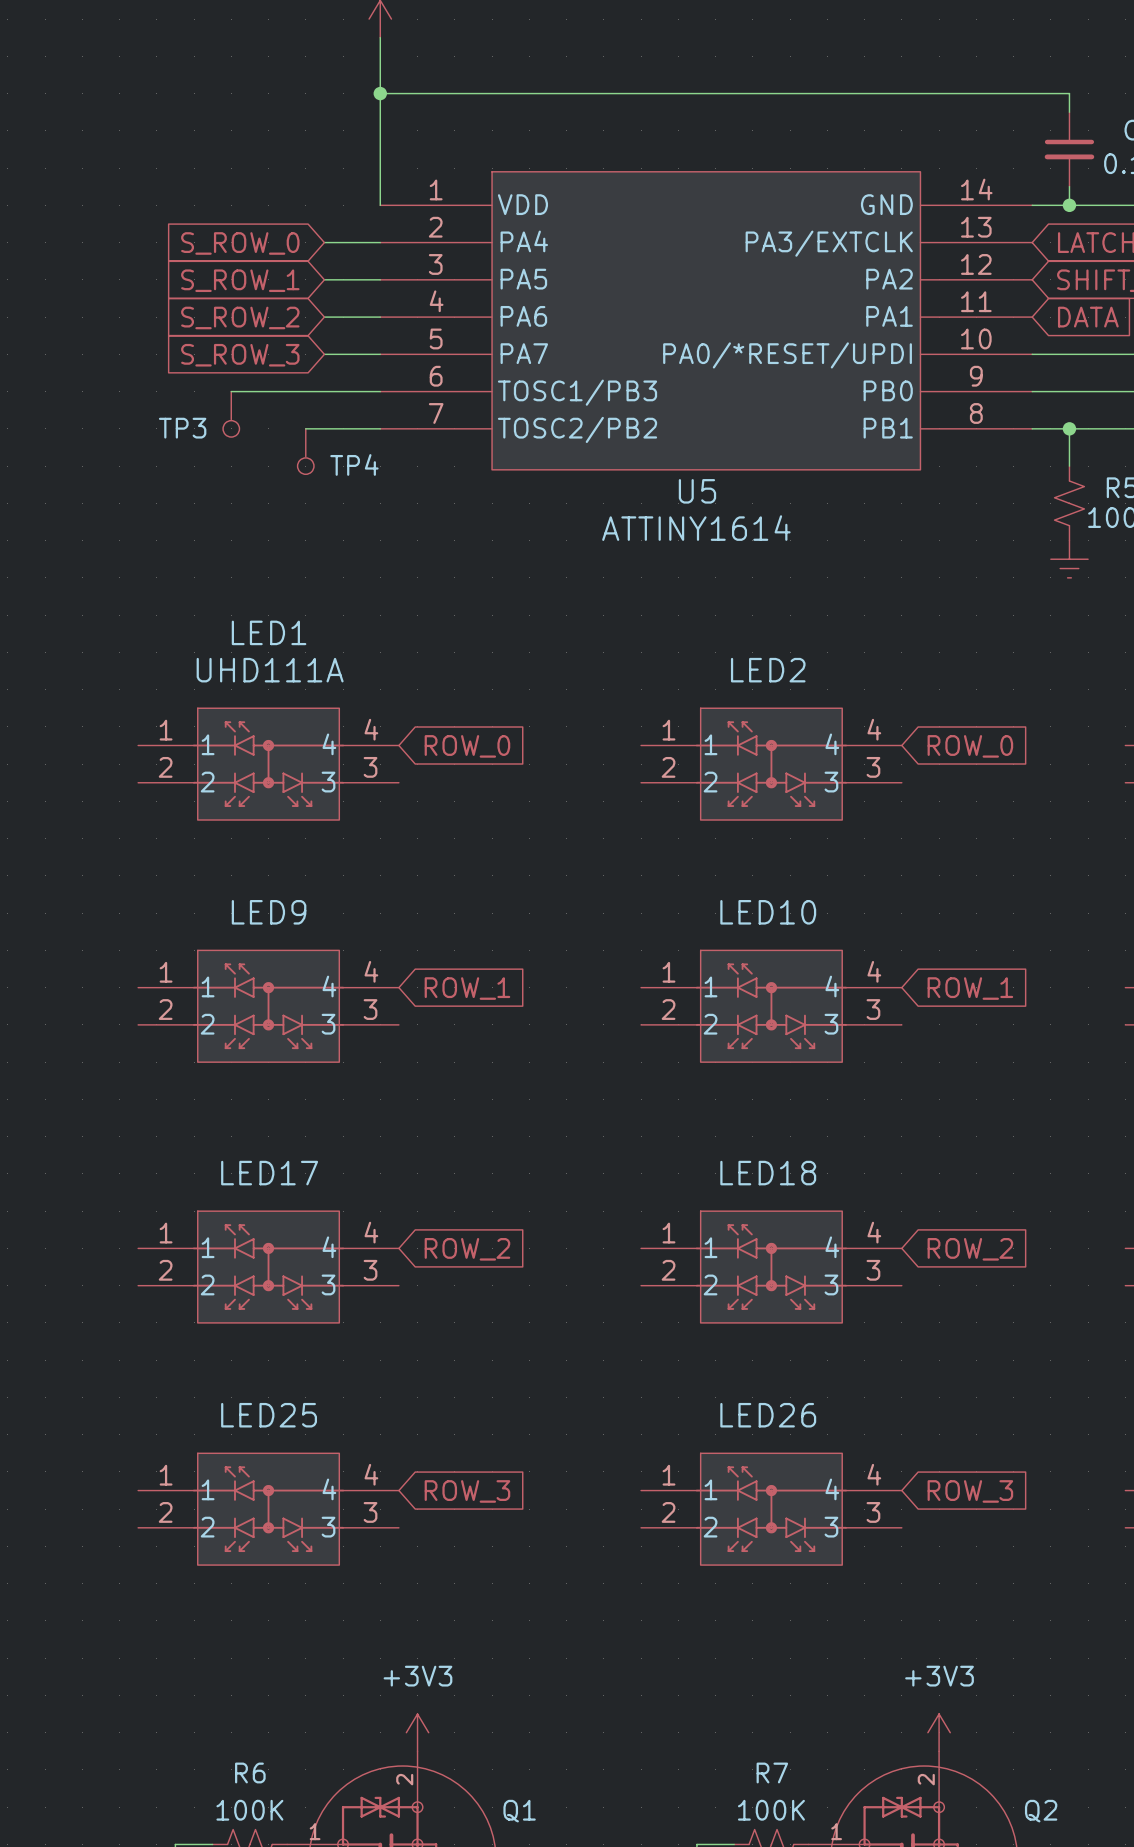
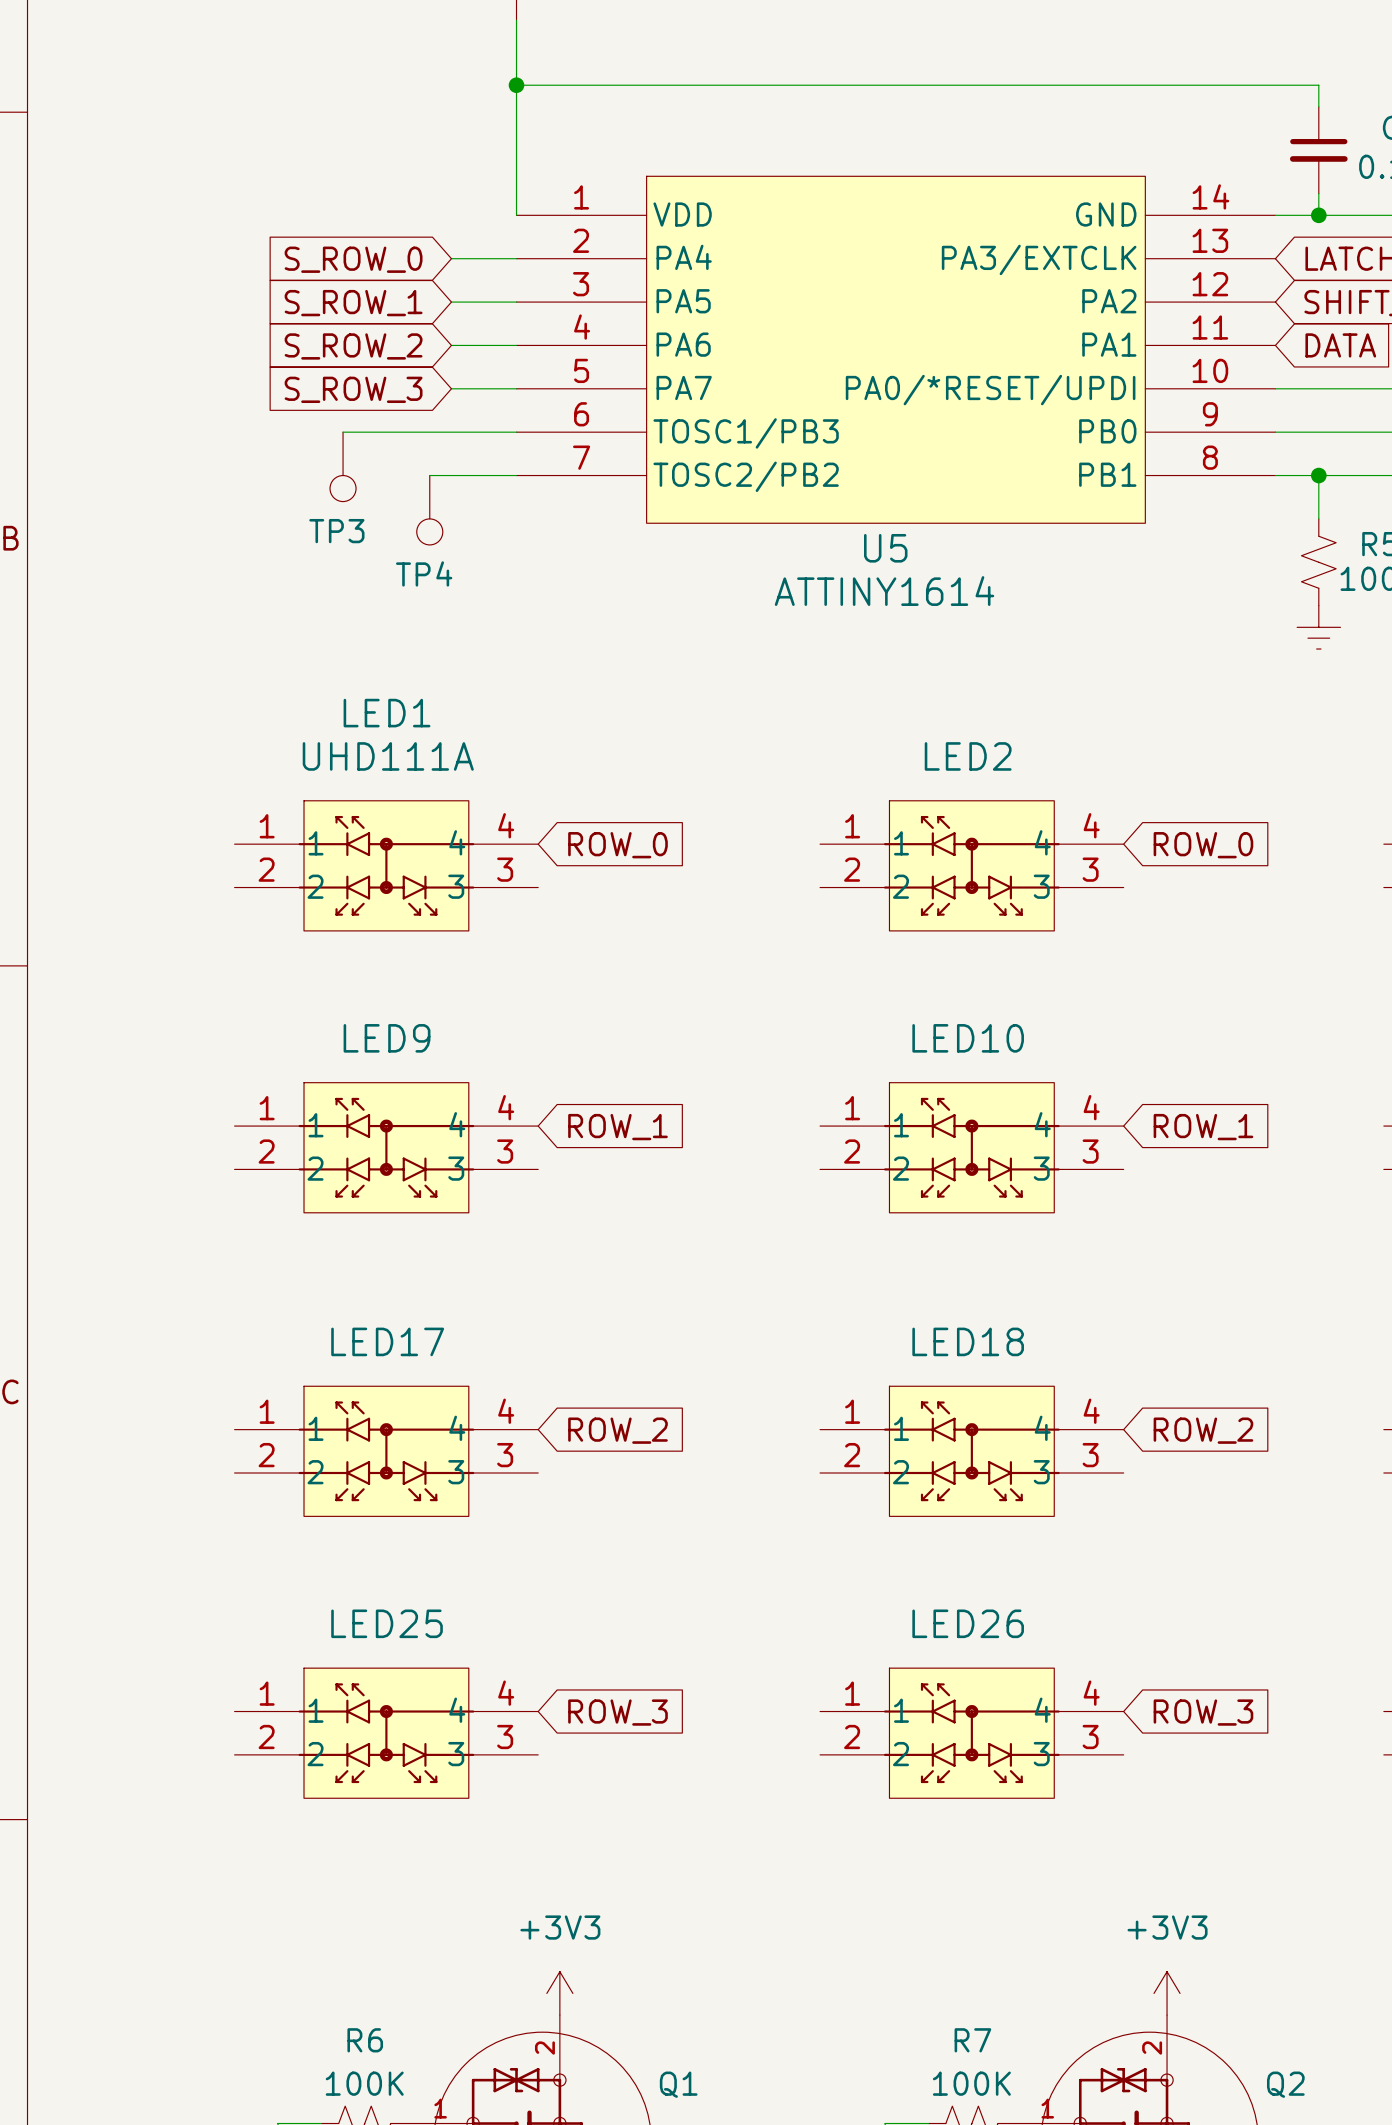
TP3 symbol: [223, 391, 240, 438] -> [330, 432, 357, 502]
TP3 name position: TP3 (182, 428) -> TP3 (336, 531)
TP4 symbol: [297, 428, 314, 475] -> [416, 475, 443, 545]
TP4 name position: TP4 (354, 464) -> TP4 (424, 573)

